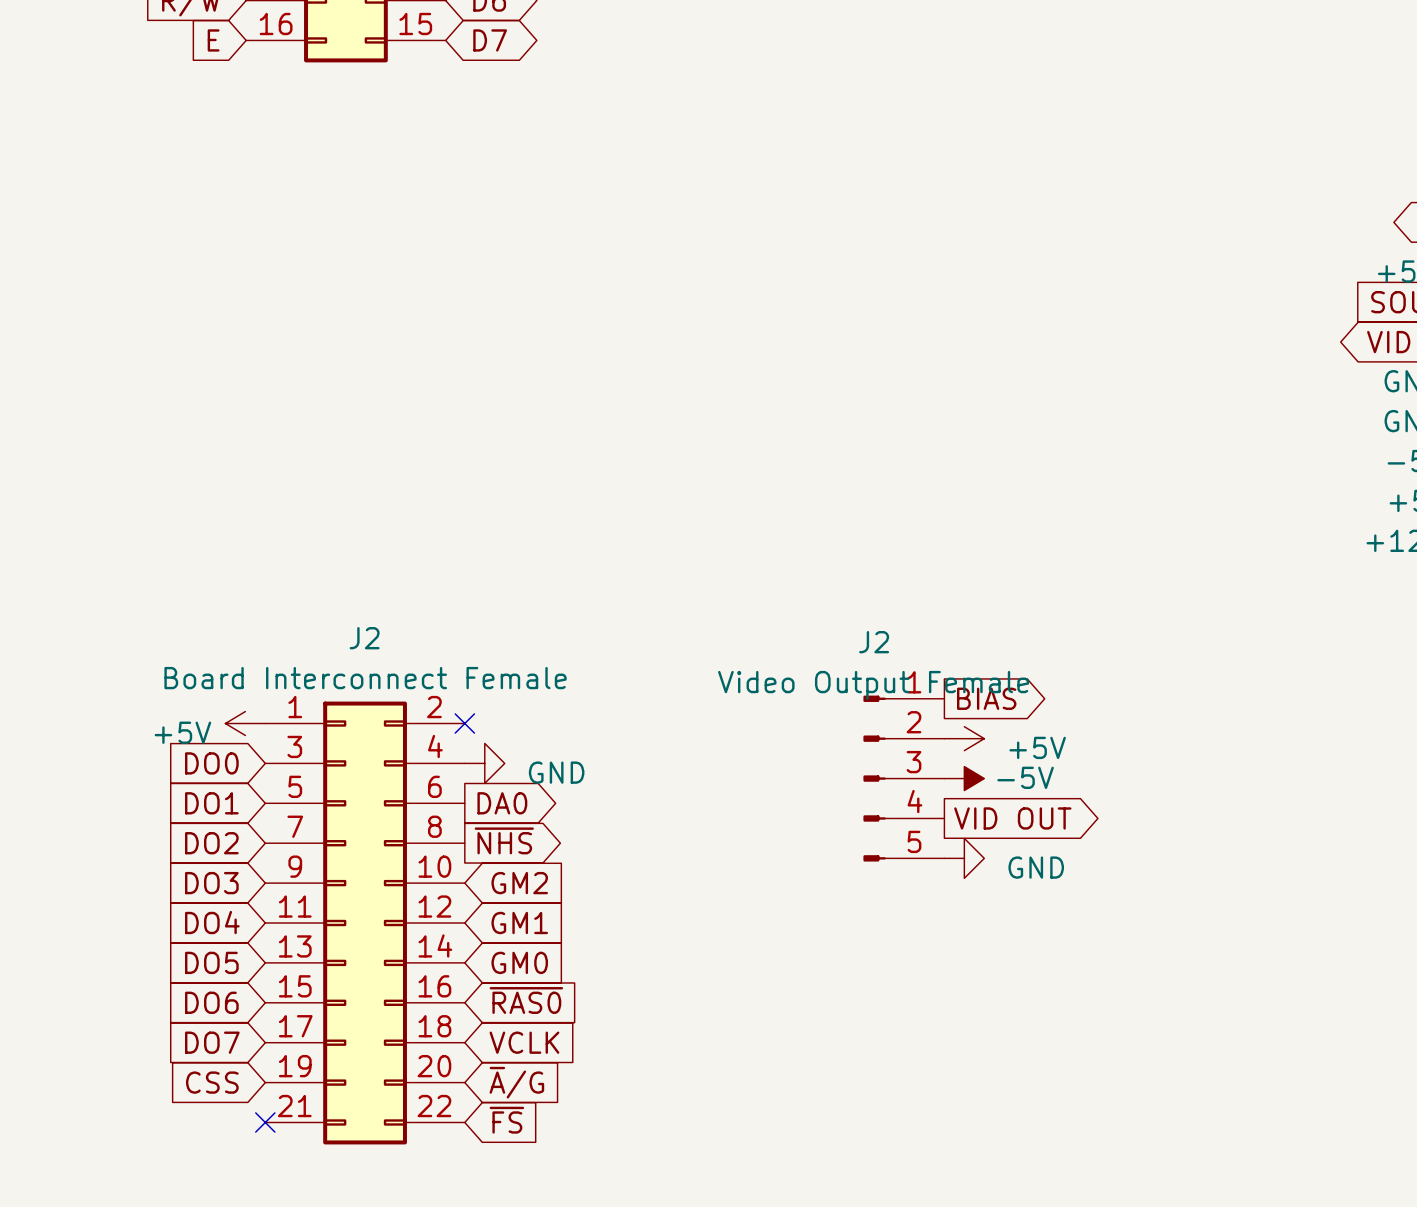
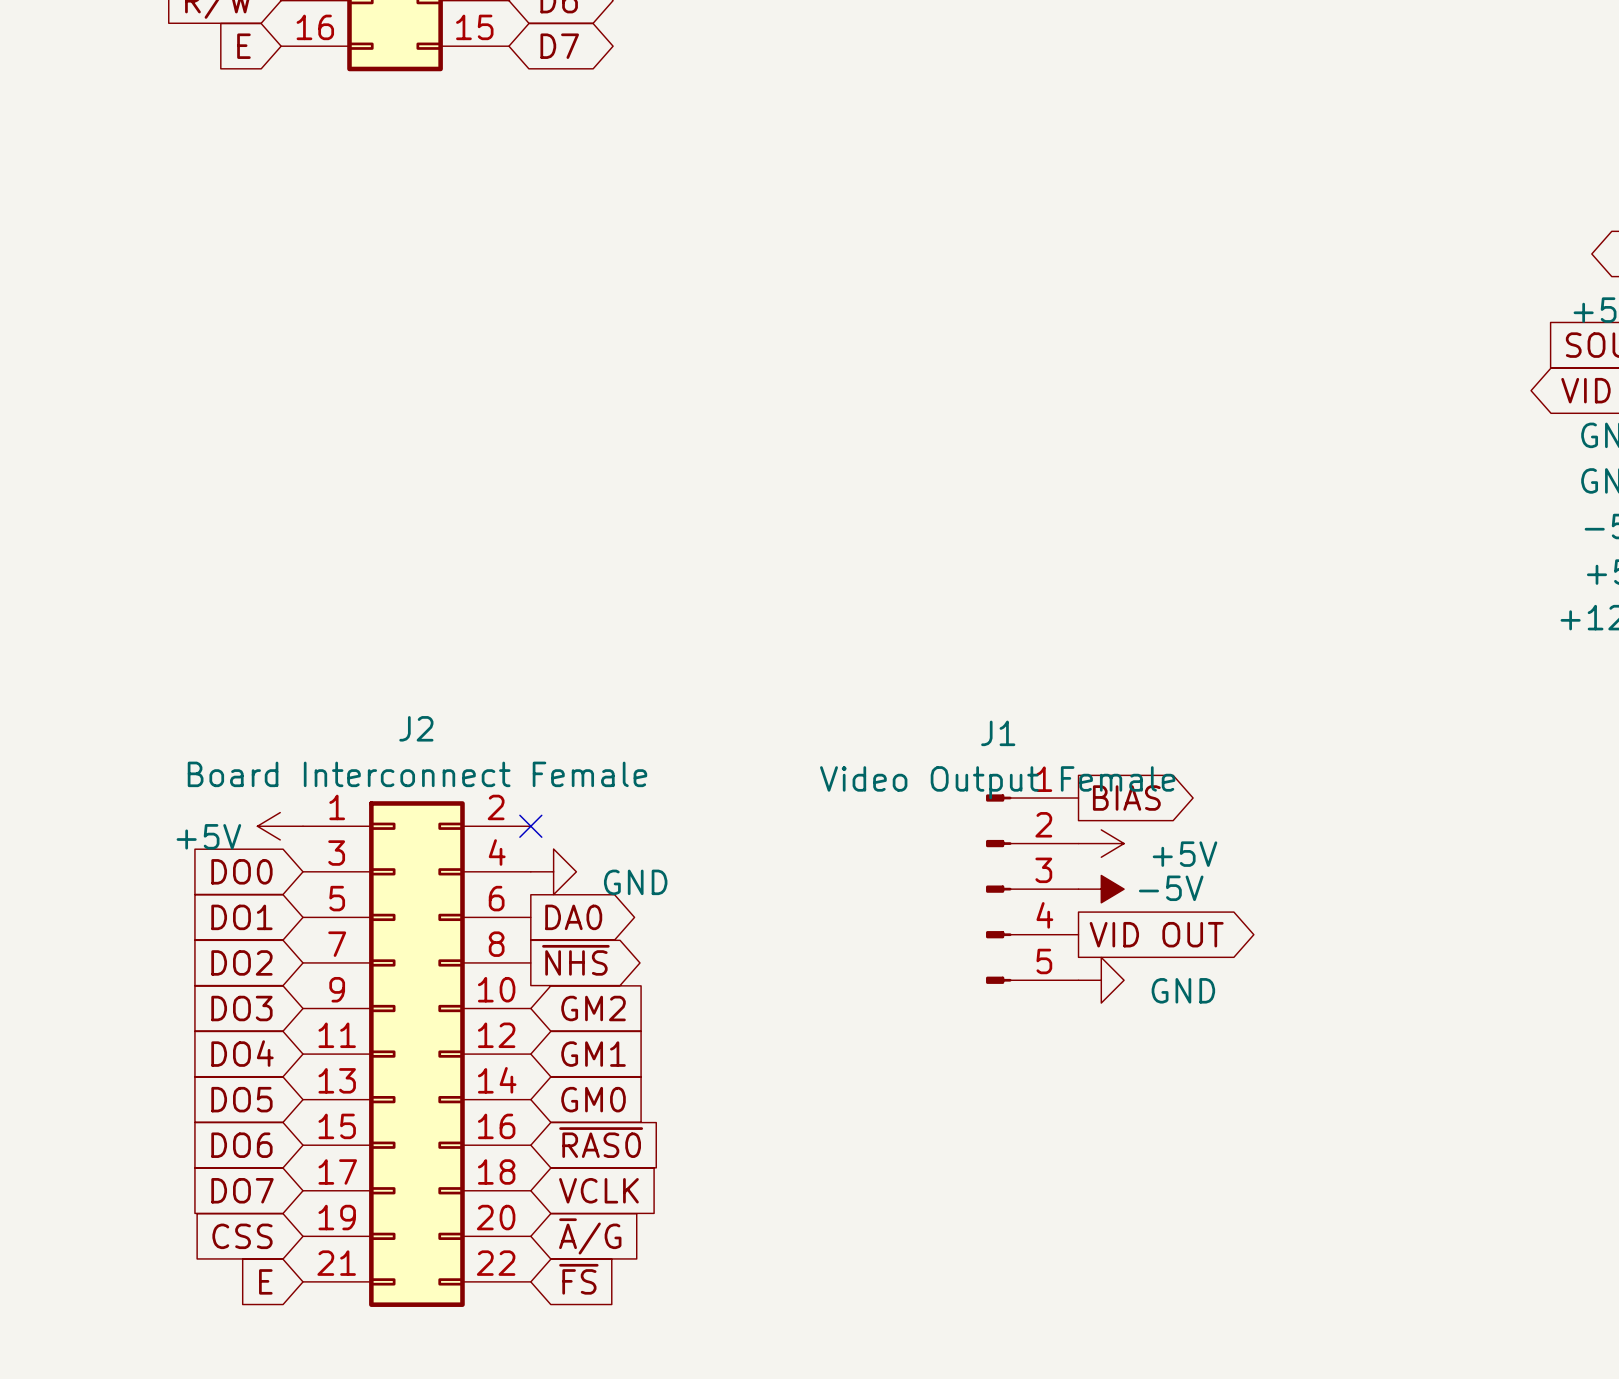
J2 name: J2 (874, 642) -> J1 (998, 733)
global label: none -> E (265, 1281)
no-connect mark: (265, 1122) -> none

